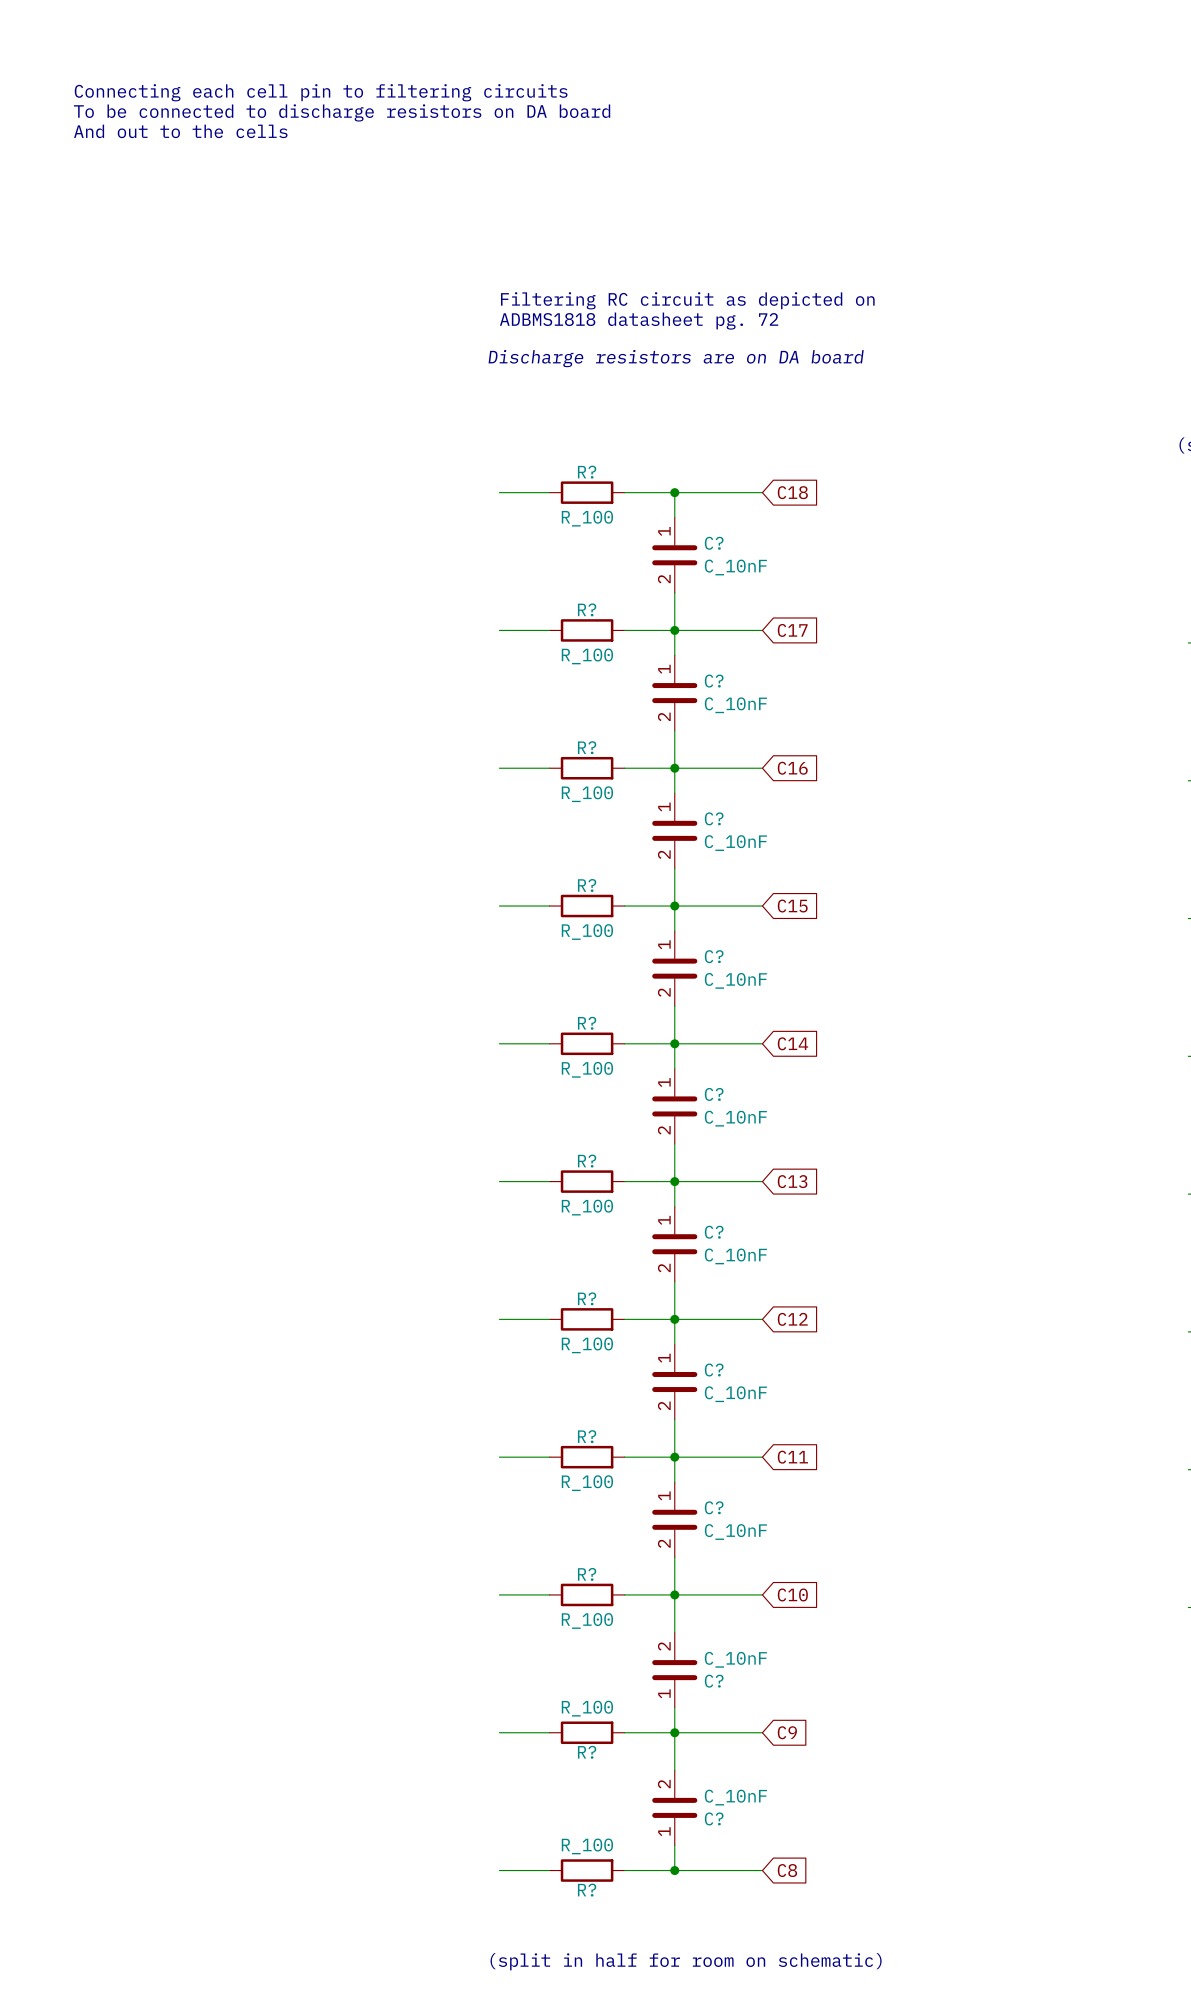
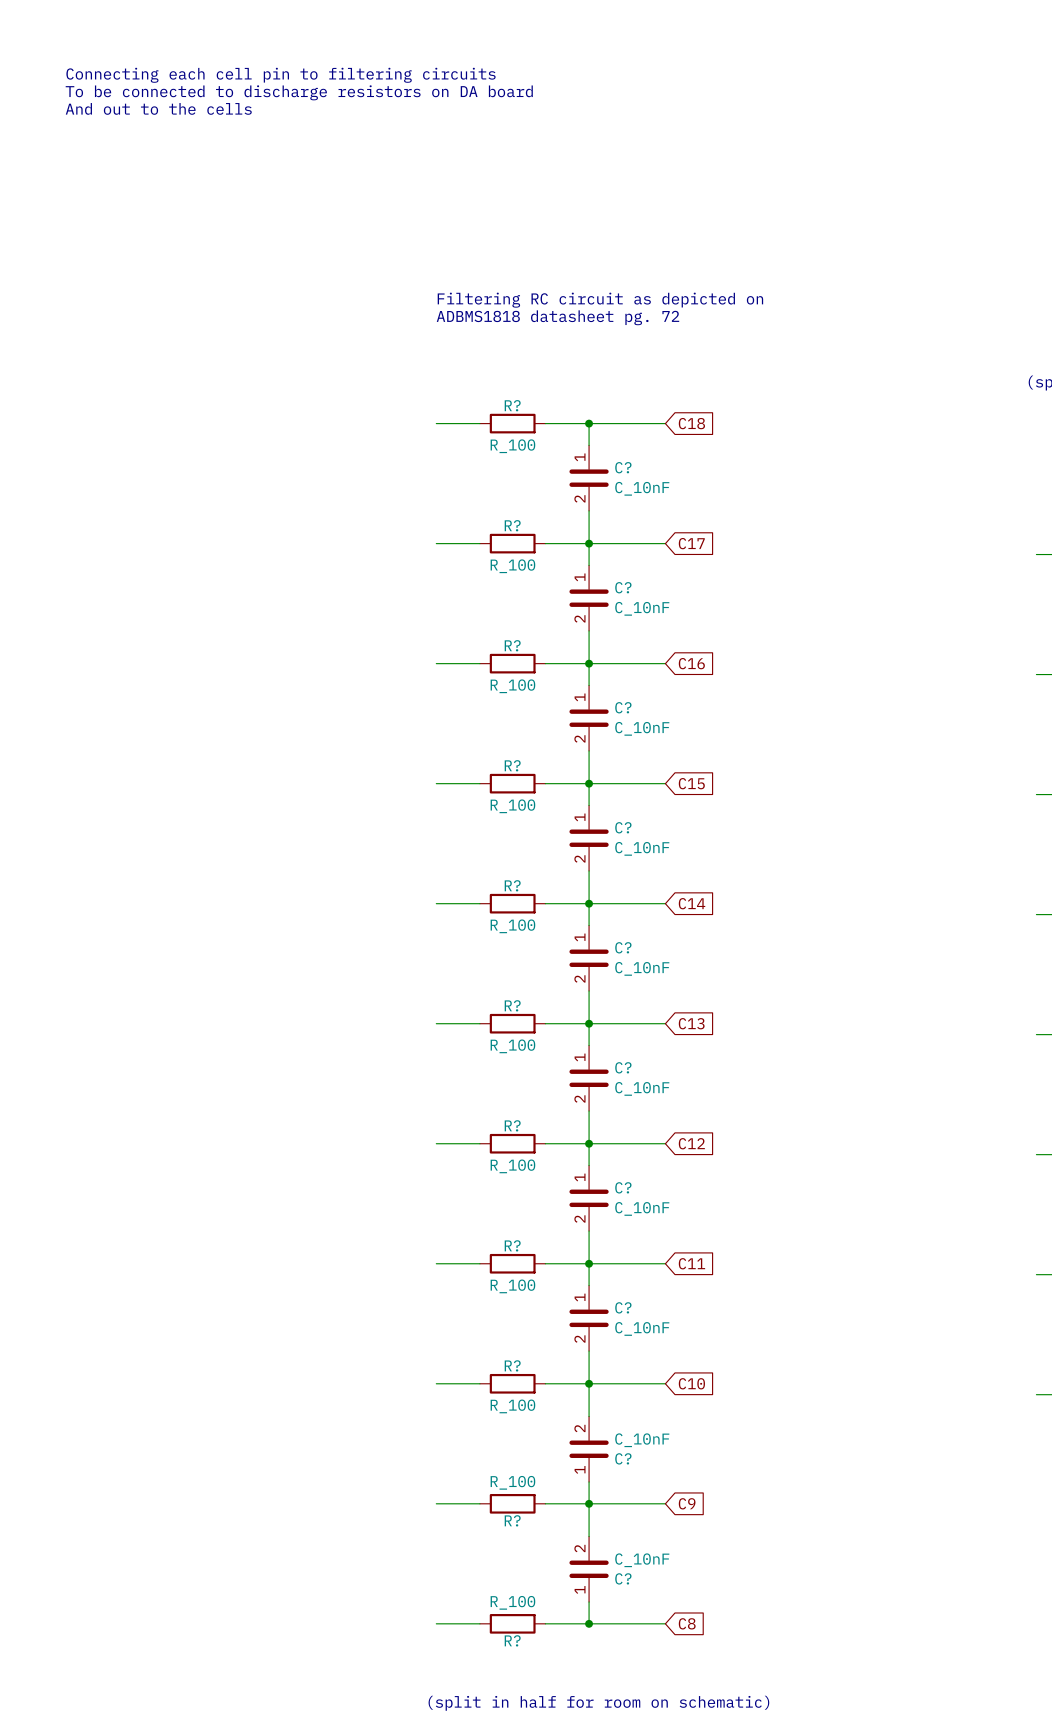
text position: Filtering RC circuit as depicted on (687, 300) -> Filtering RC circuit as depicted on (600, 300)
text position: ADBMS1818 datasheet pg. 72 (639, 321) -> ADBMS1818 datasheet pg. 72 (557, 317)
text: Discharge resistors are on DA board (676, 358) -> none

